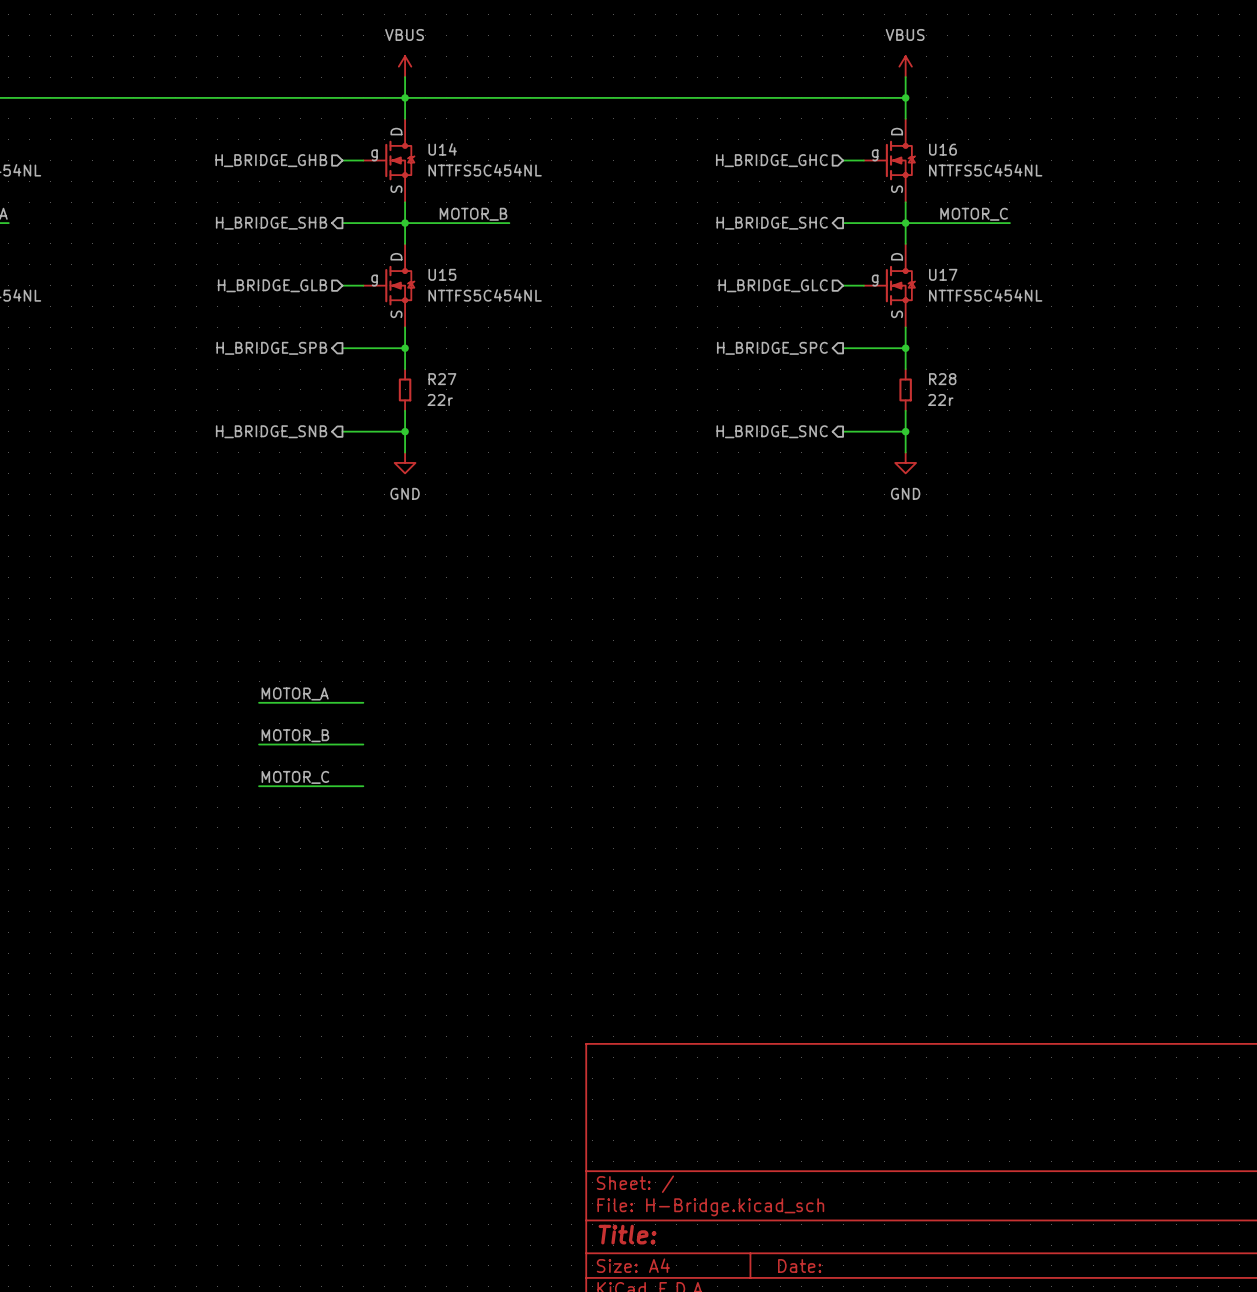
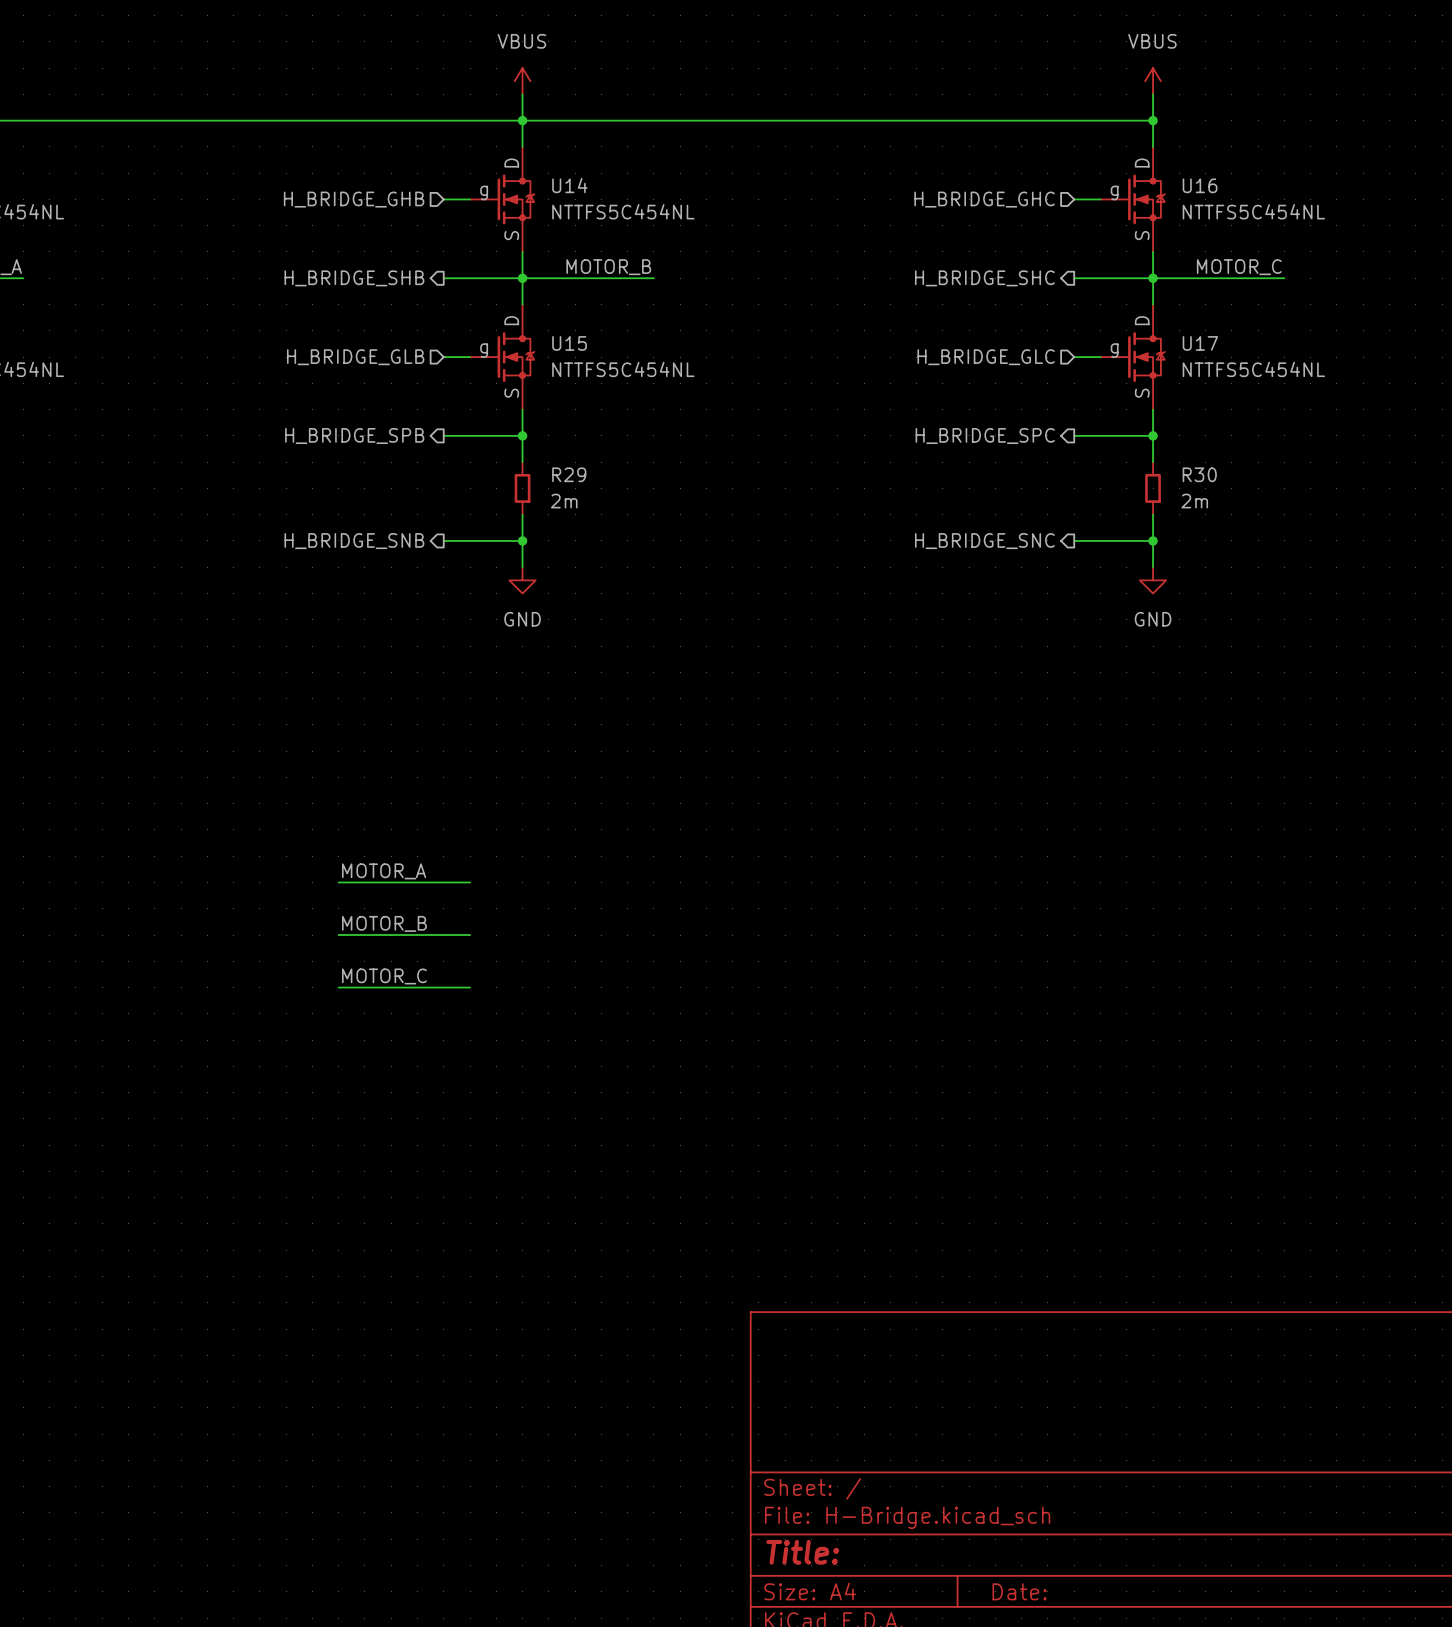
R27 name: R27 (442, 379) -> R29 (569, 474)
R28 name: R28 (942, 379) -> R30 (1199, 474)
R27 value: 22r (440, 399) -> 2m (564, 501)
R28 value: 22r (940, 399) -> 2m (1194, 501)

